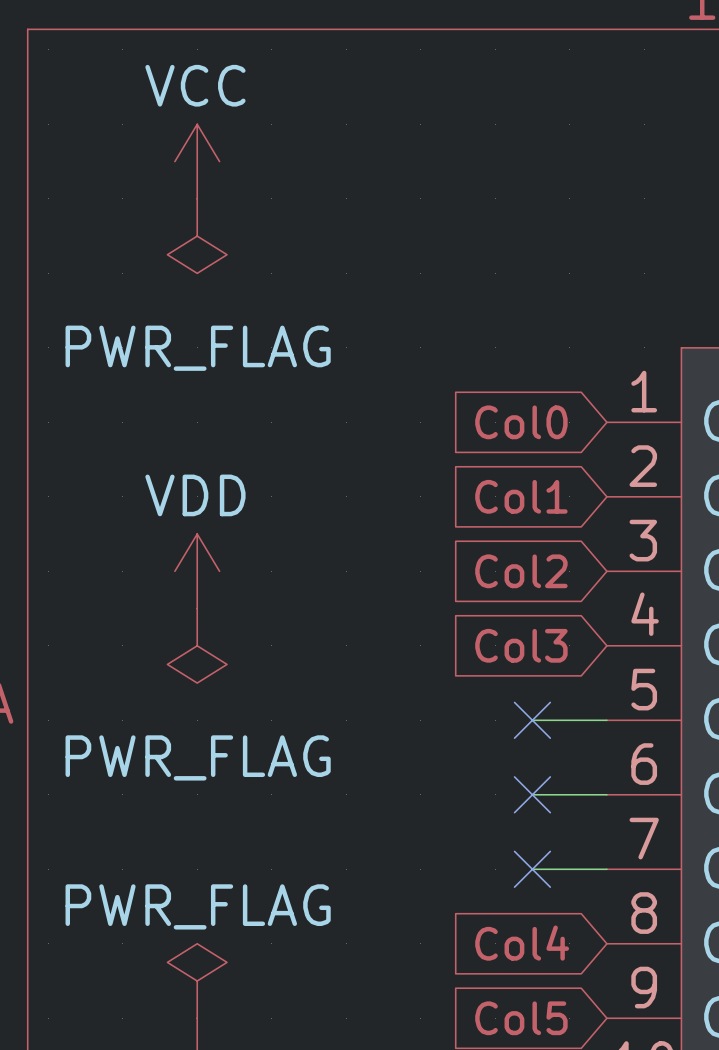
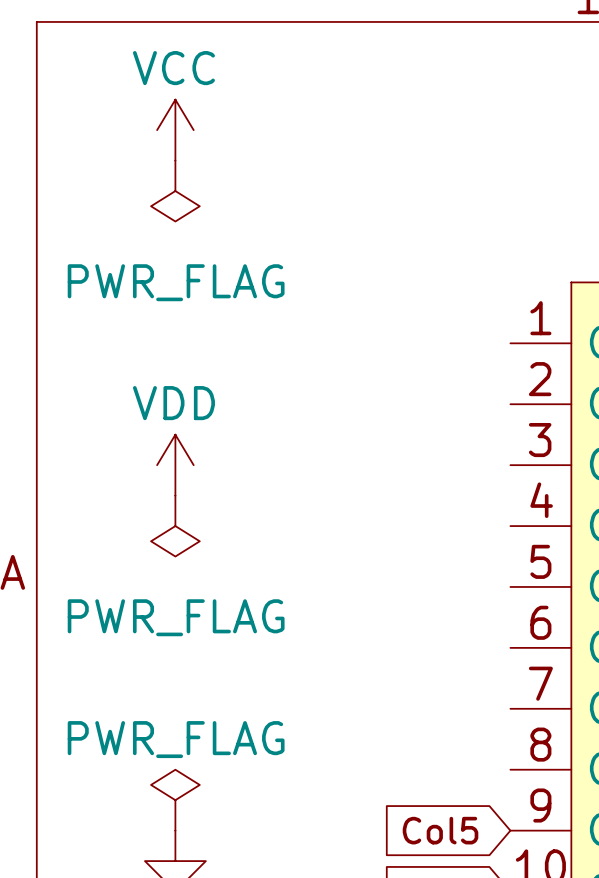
global label: Col0 (521, 422) -> none
global label: Col1 (521, 496) -> none
global label: Col2 (521, 571) -> none
global label: Col3 (521, 645) -> none
wire: (532, 720) (606, 720) -> none
no-connect mark: (532, 720) -> none
wire: (532, 794) (606, 794) -> none
no-connect mark: (532, 794) -> none
wire: (532, 869) (606, 869) -> none
no-connect mark: (532, 869) -> none
global label: Col4 (522, 943) -> none

